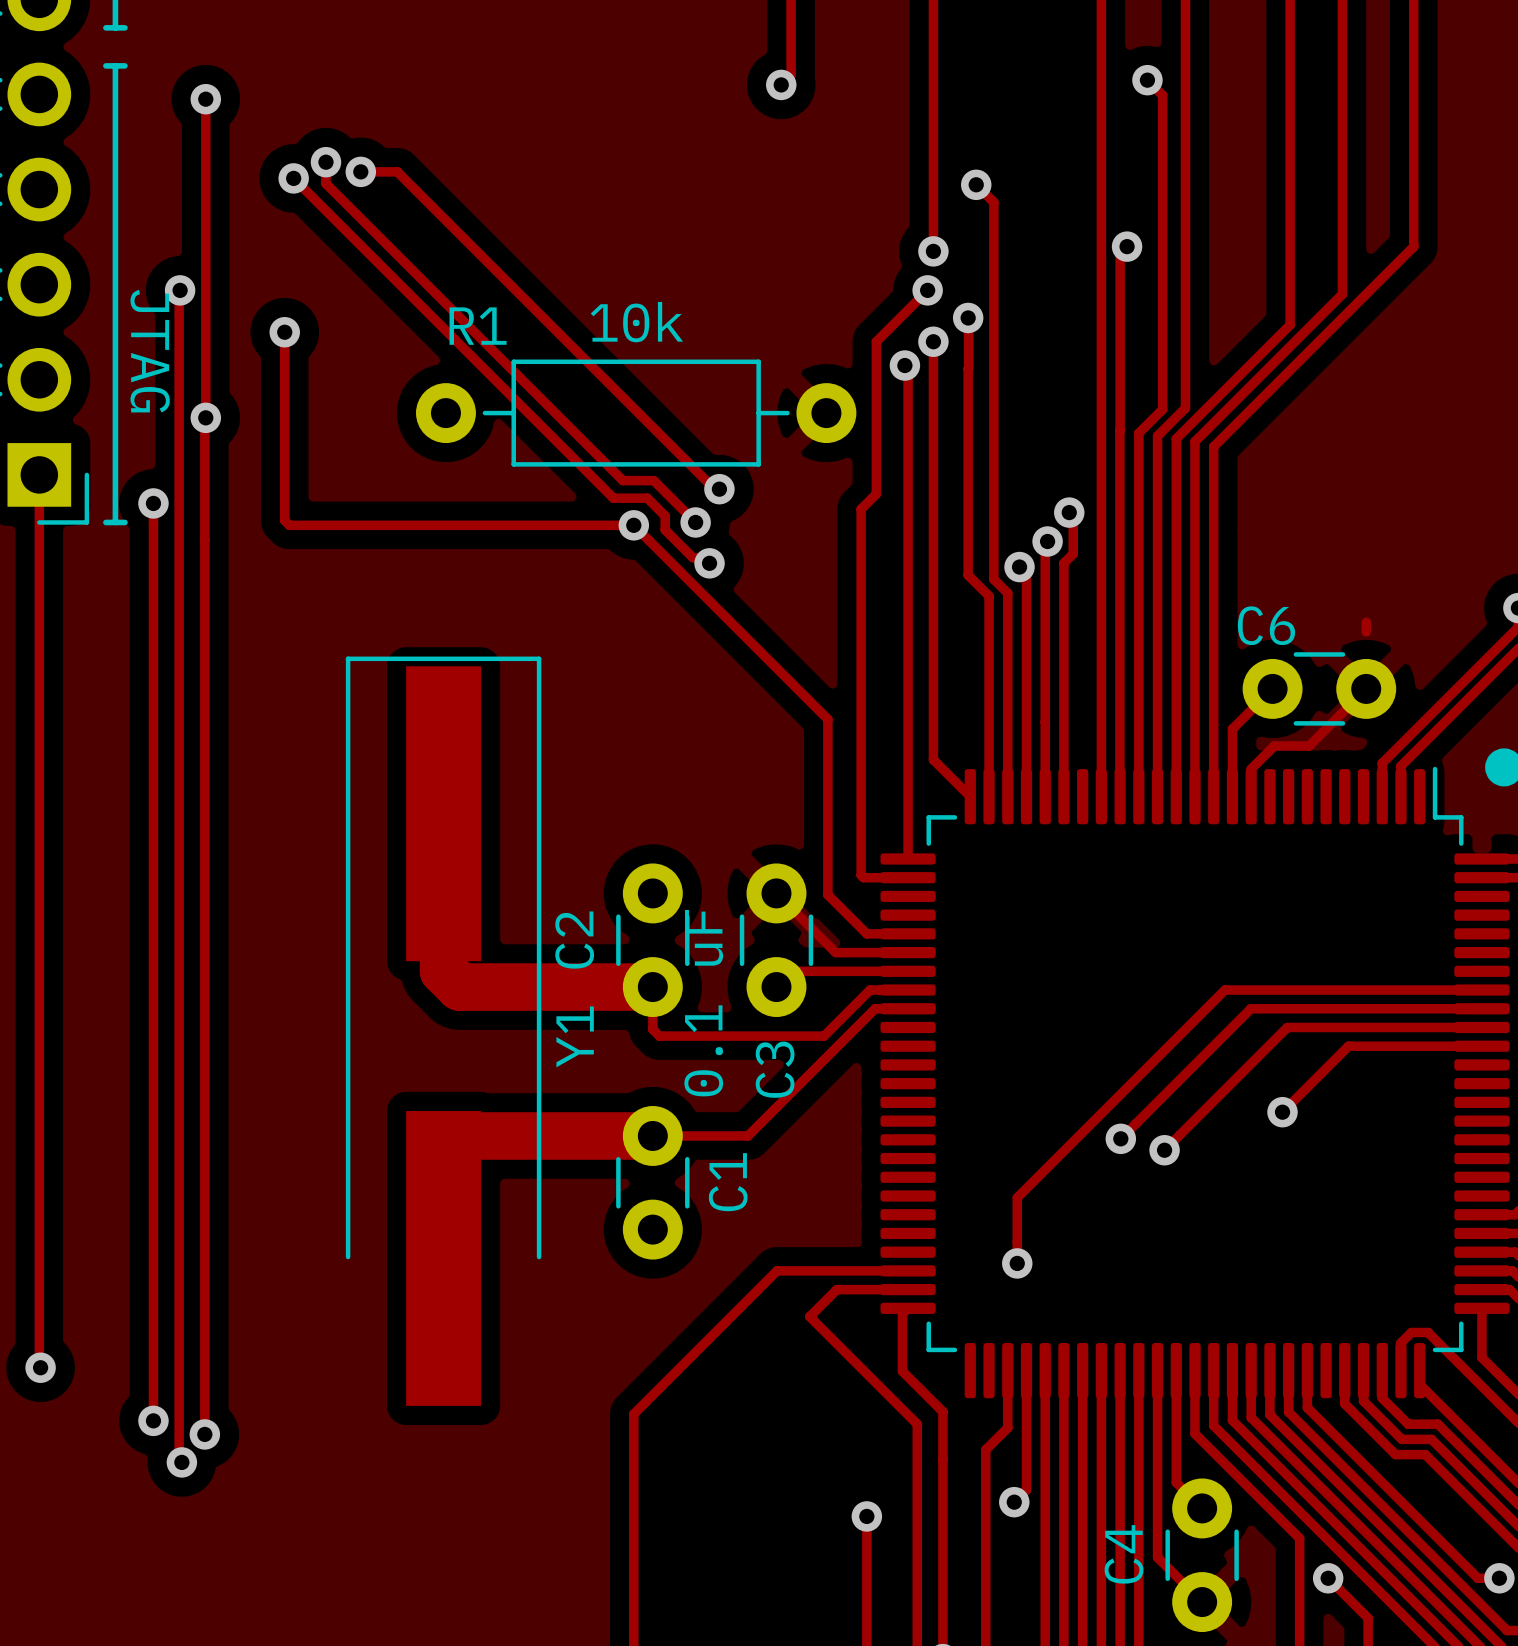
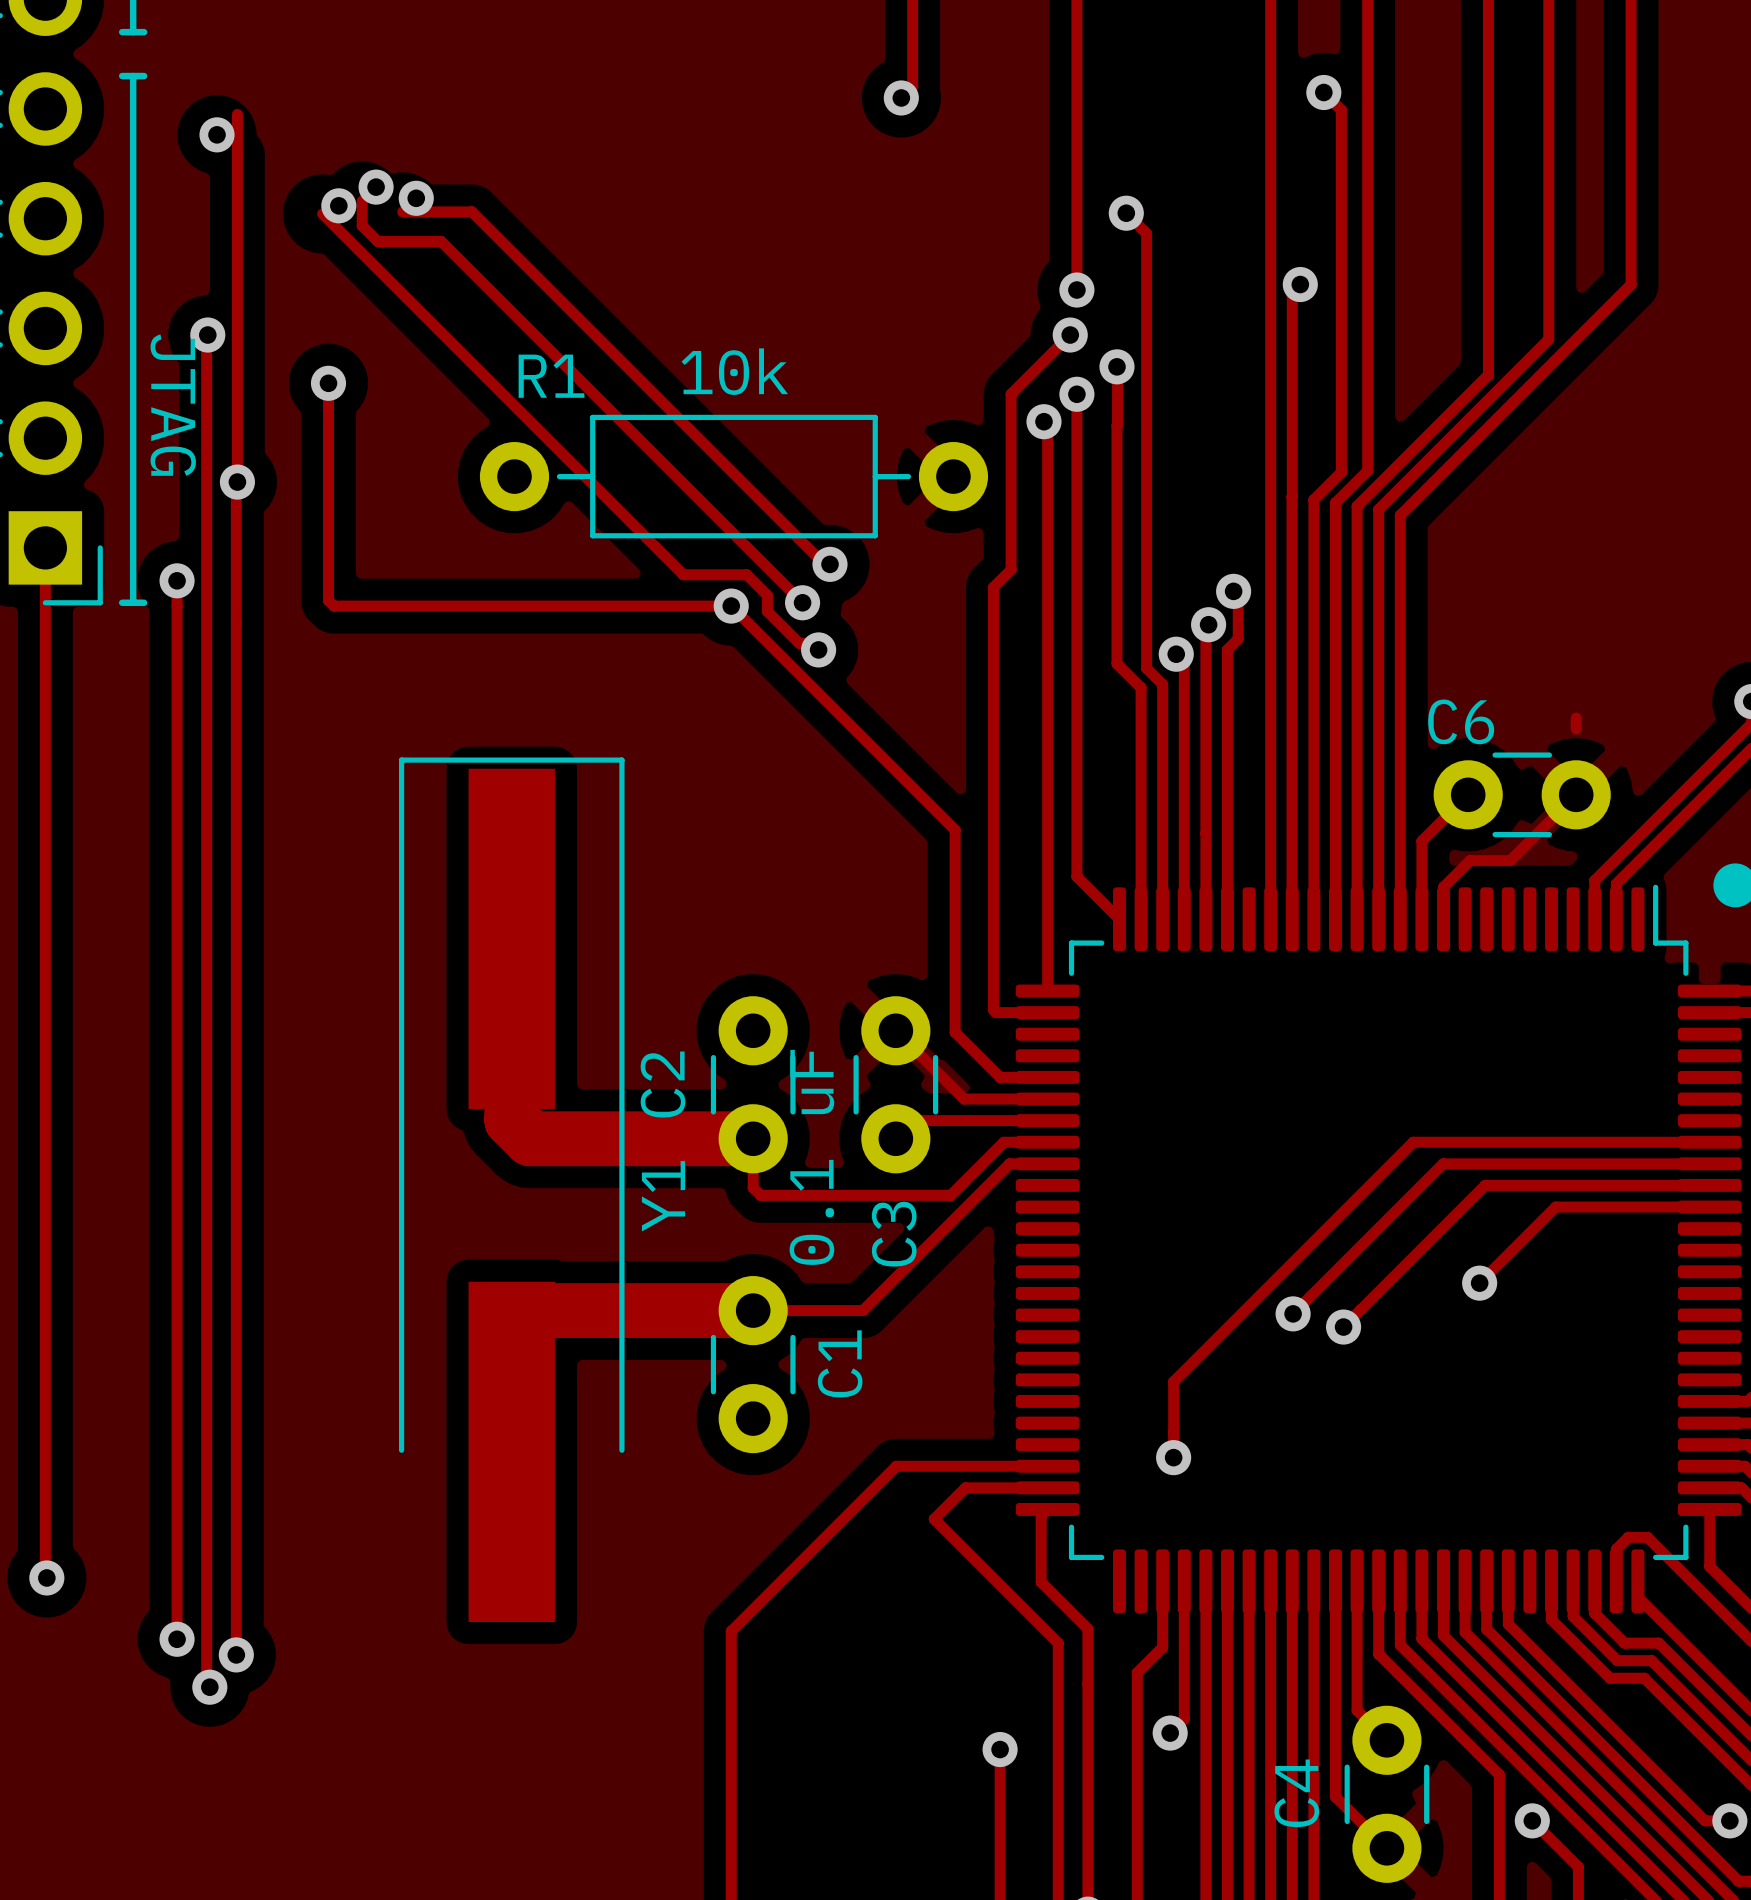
via position: (205, 99) -> (217, 134)
track: (325, 162) (325, 183) (622, 480) (653, 480) -> (362, 201) (362, 225) (377, 241) (441, 241) (754, 554)
track: (360, 171) (397, 171) (409, 183) -> (402, 211) (472, 211)
track: (293, 178) (613, 498) -> (322, 213) (683, 574) (707, 574)

